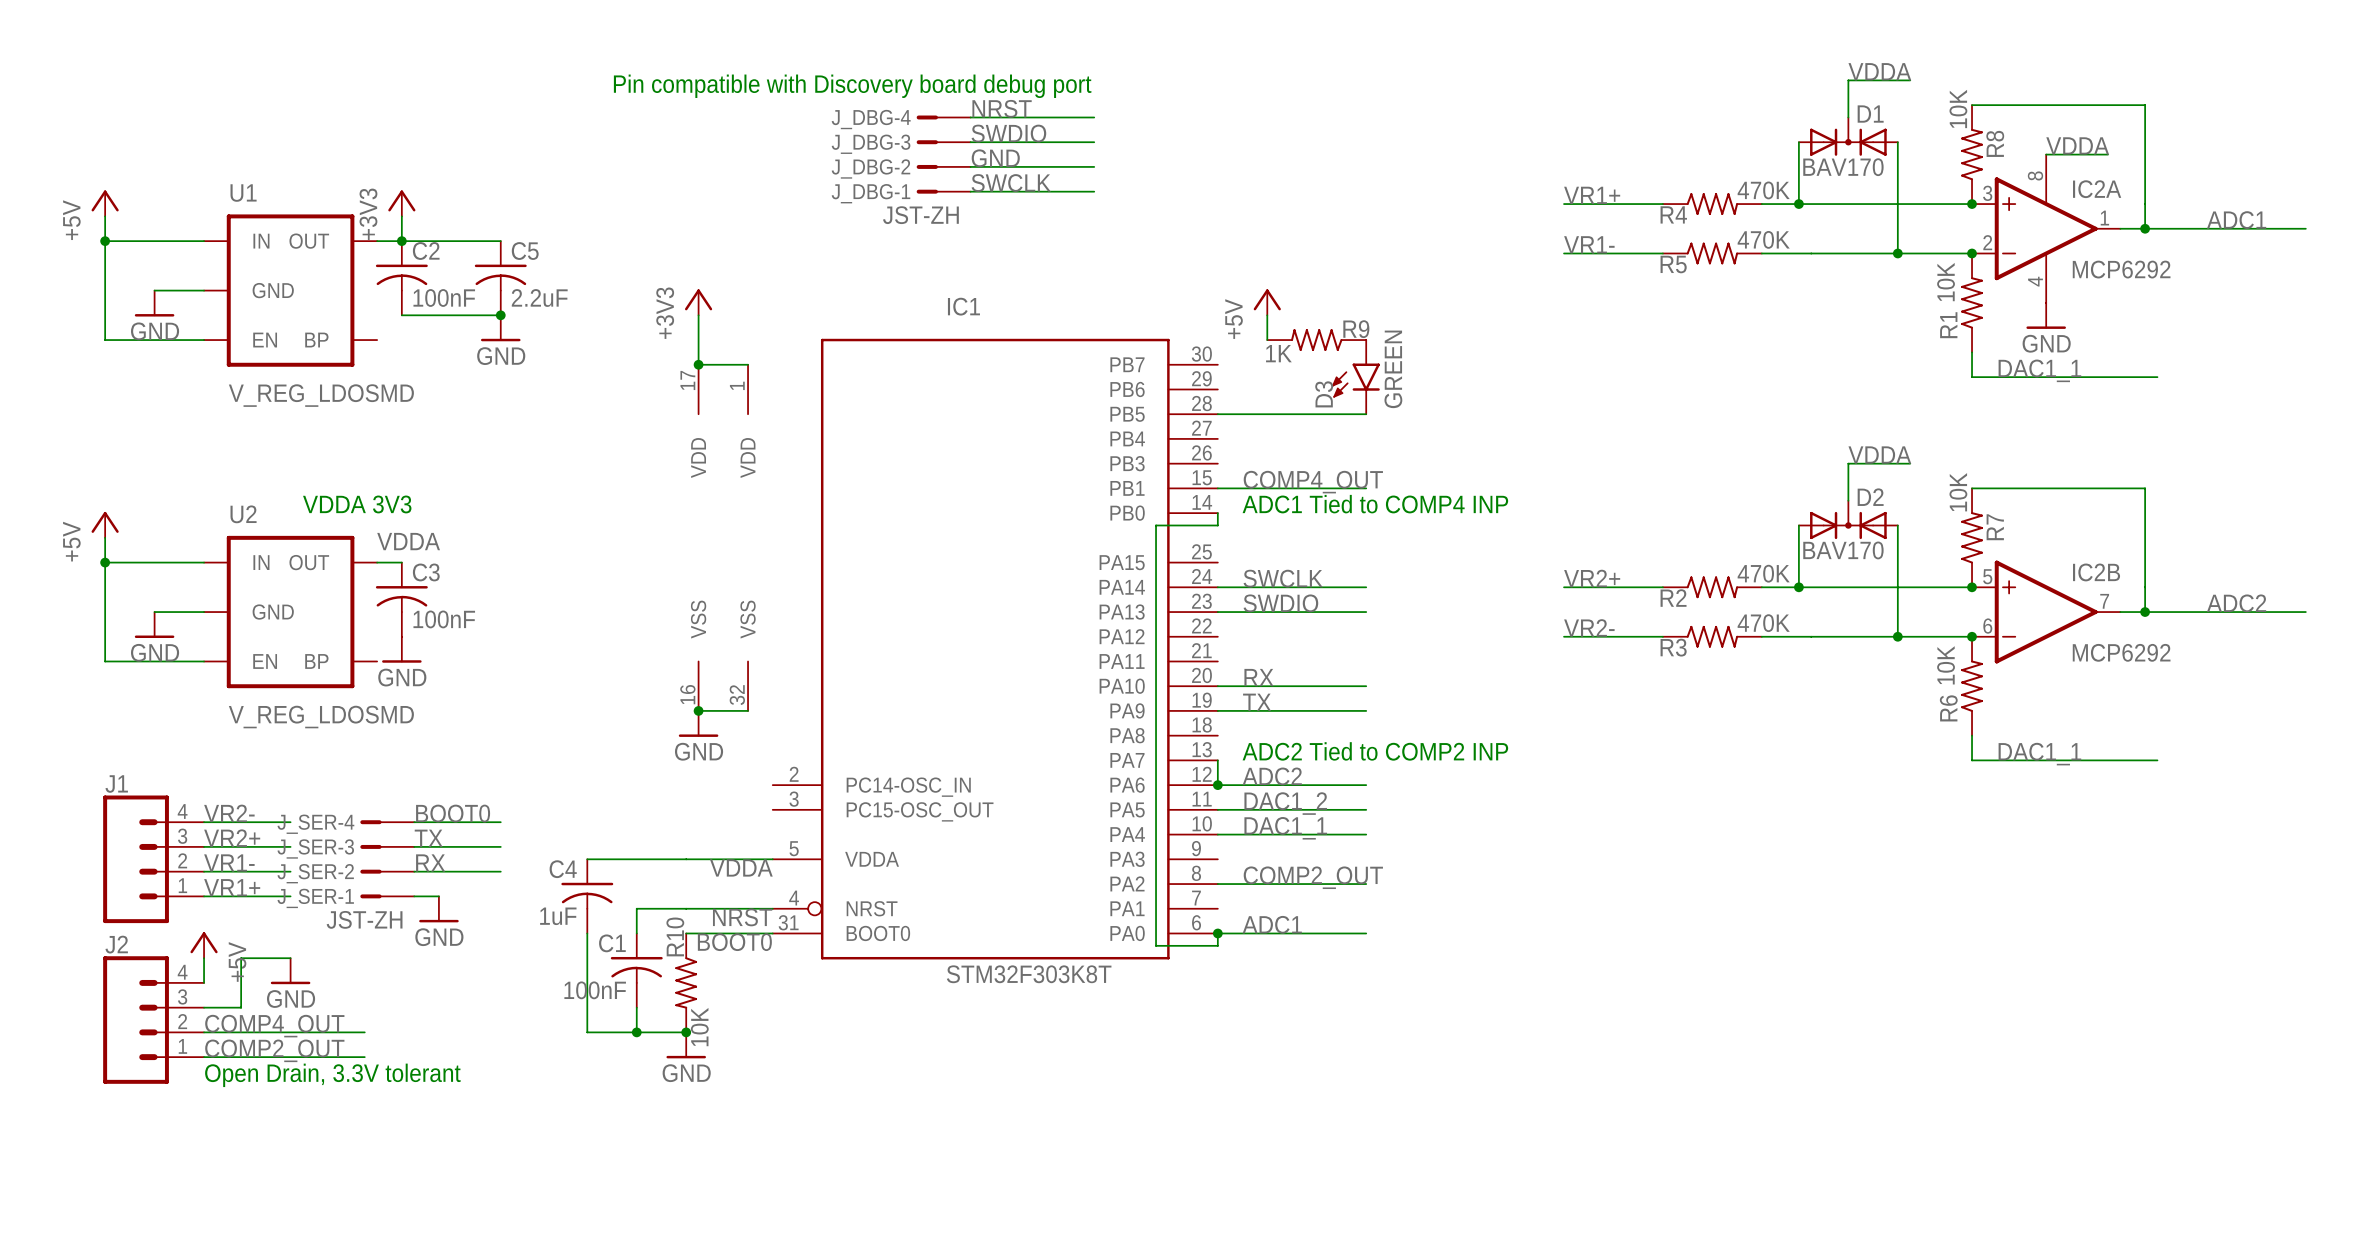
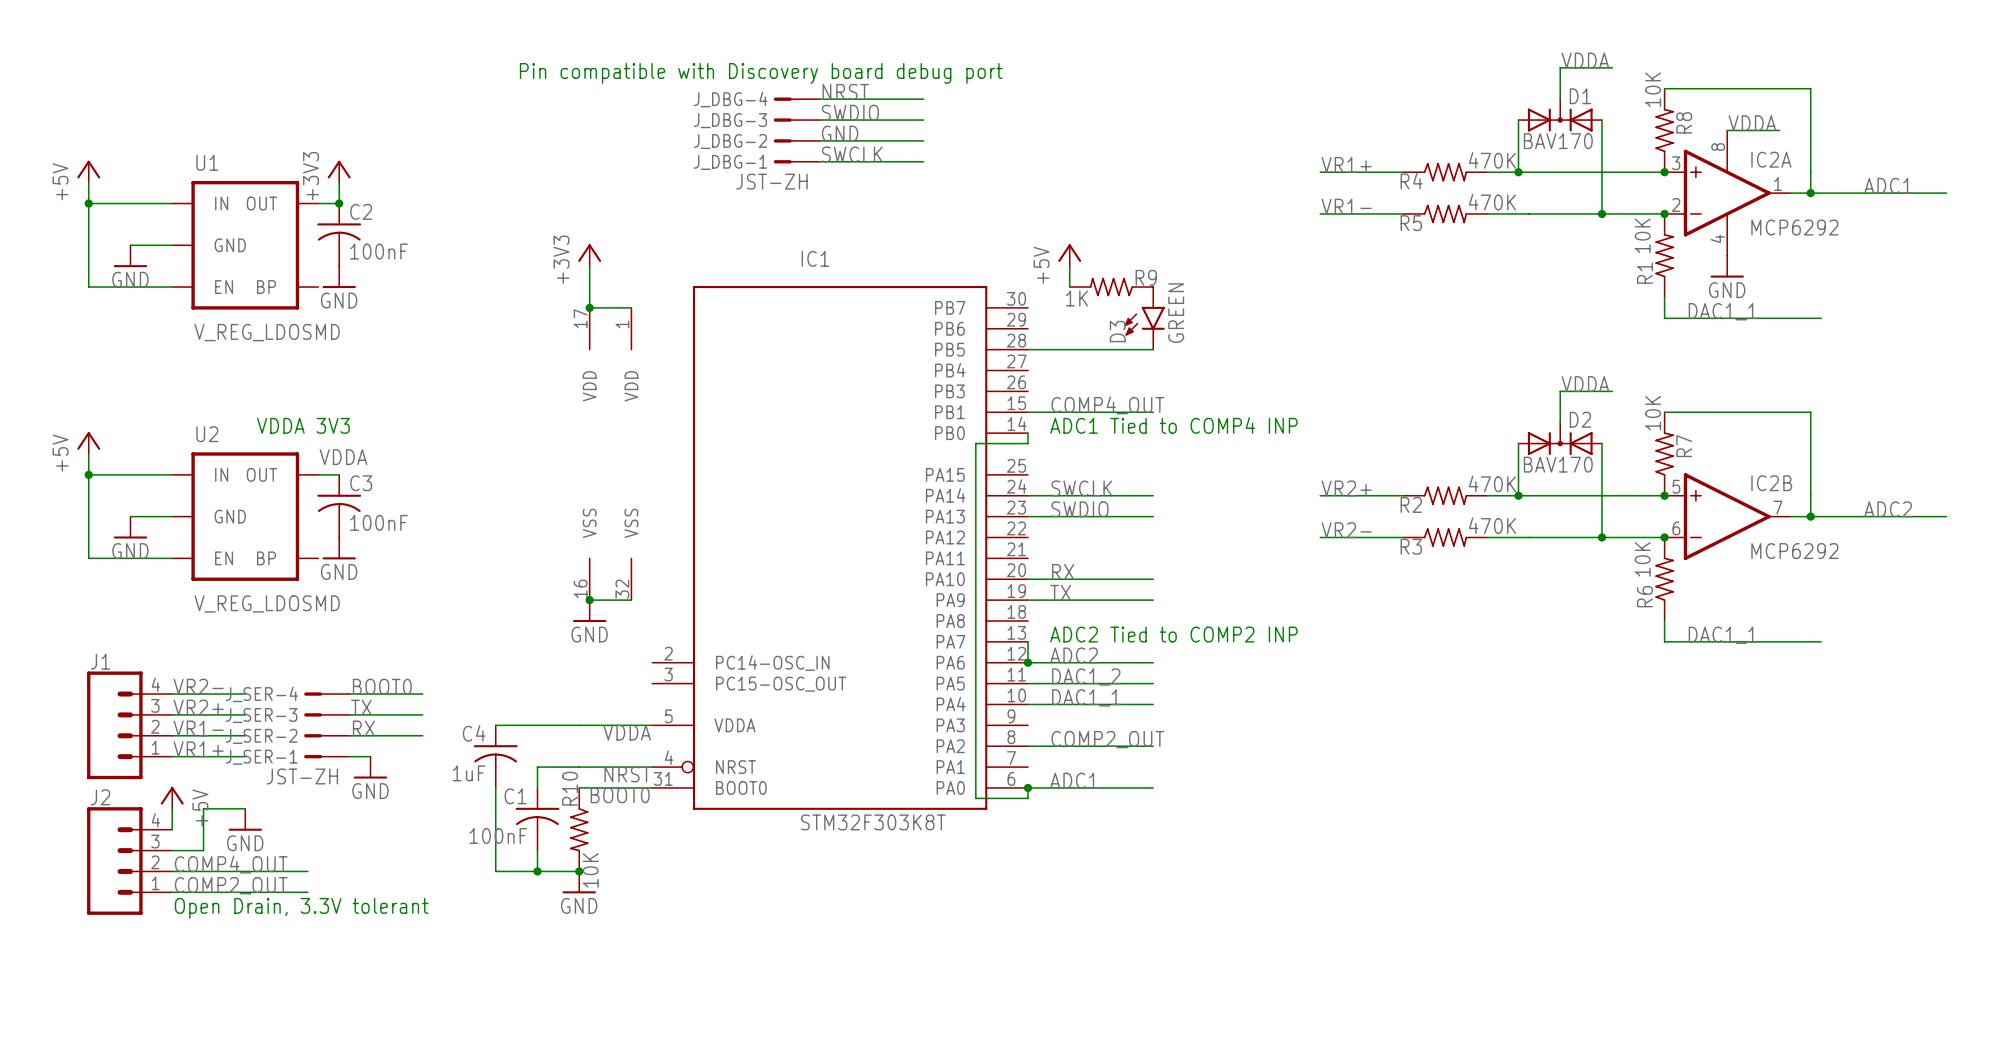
wire: (401, 241) (500, 241) -> none
C5: 2.2uF (500, 278) -> none
wire: (401, 315) (500, 315) -> none
junction: (500, 315) -> none
power symbol position: GND (500, 328) -> GND (339, 277)

